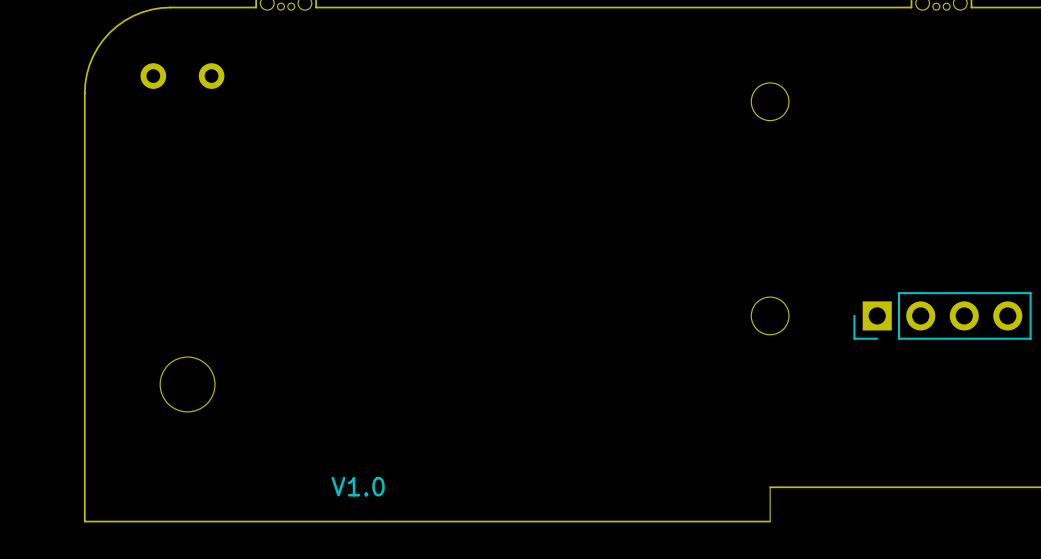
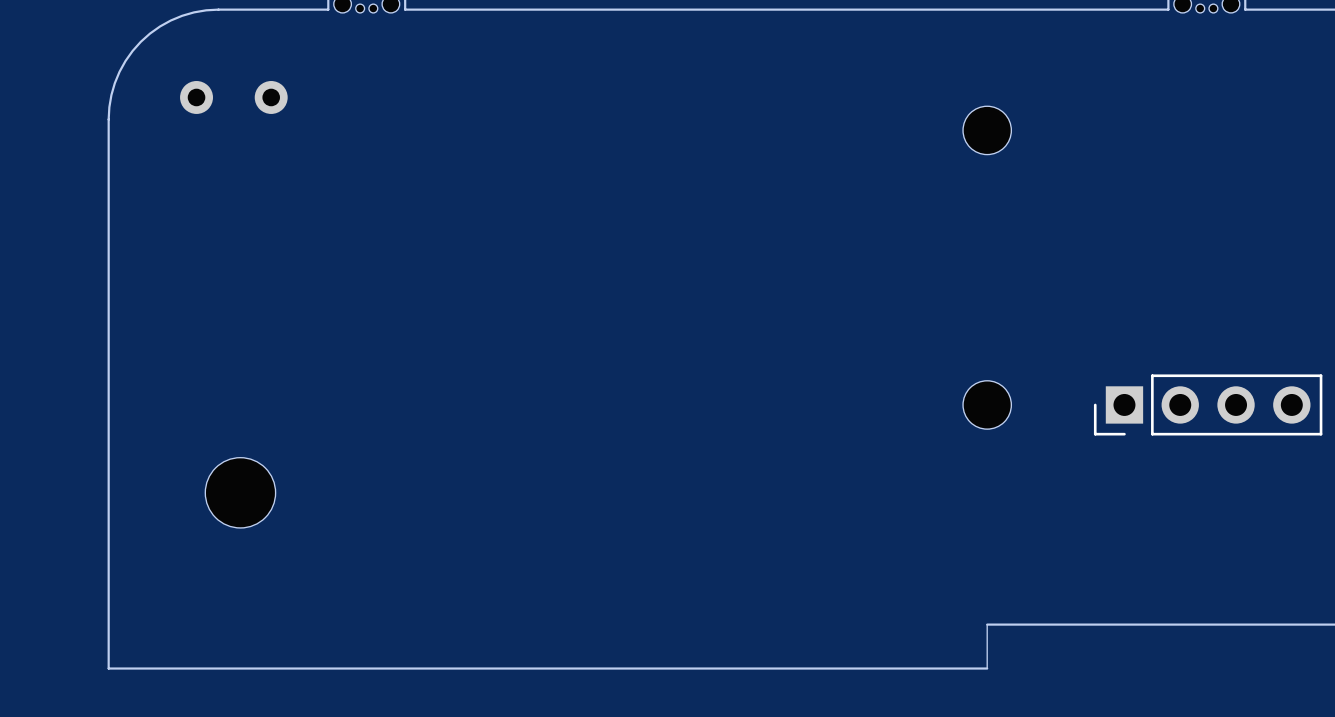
text: V1.0 (358, 486) -> none

